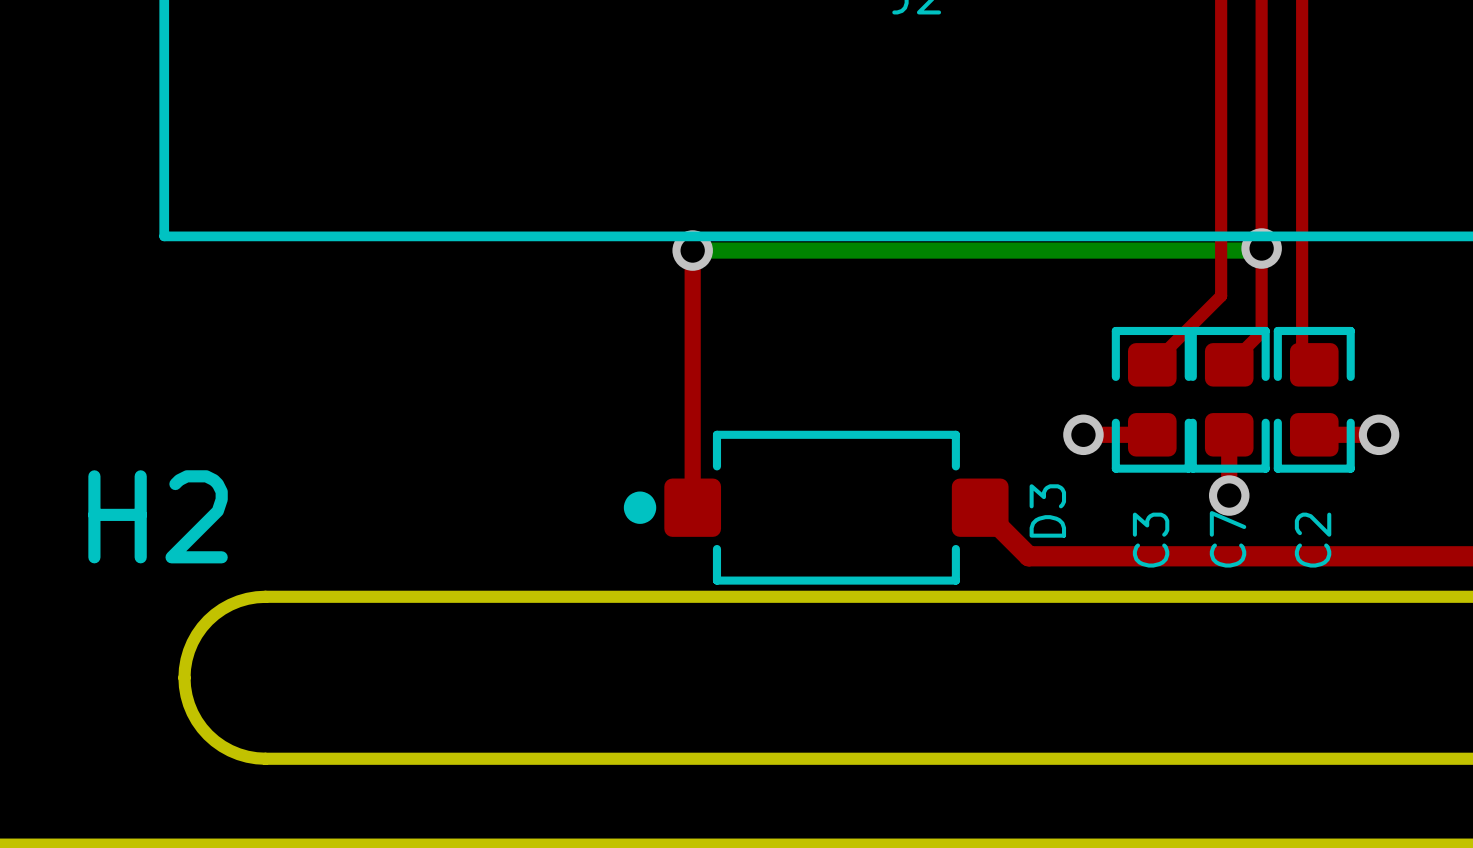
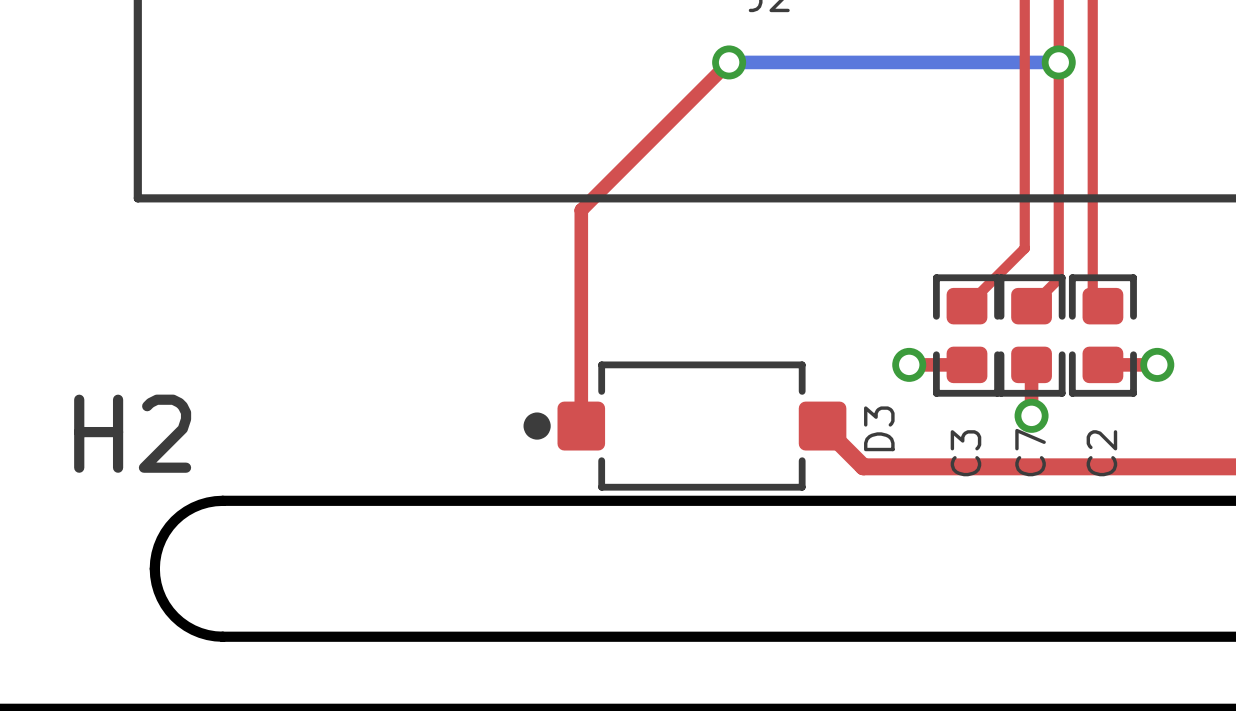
top track: none -> (729, 62) (581, 210)
bottom track: none -> (729, 62) (1058, 62)
via: none -> (729, 62)
bottom track: (1261, 248) (1259, 250) (692, 250) -> none
via position: (1261, 248) -> (1058, 62)
via: (692, 250) -> none

